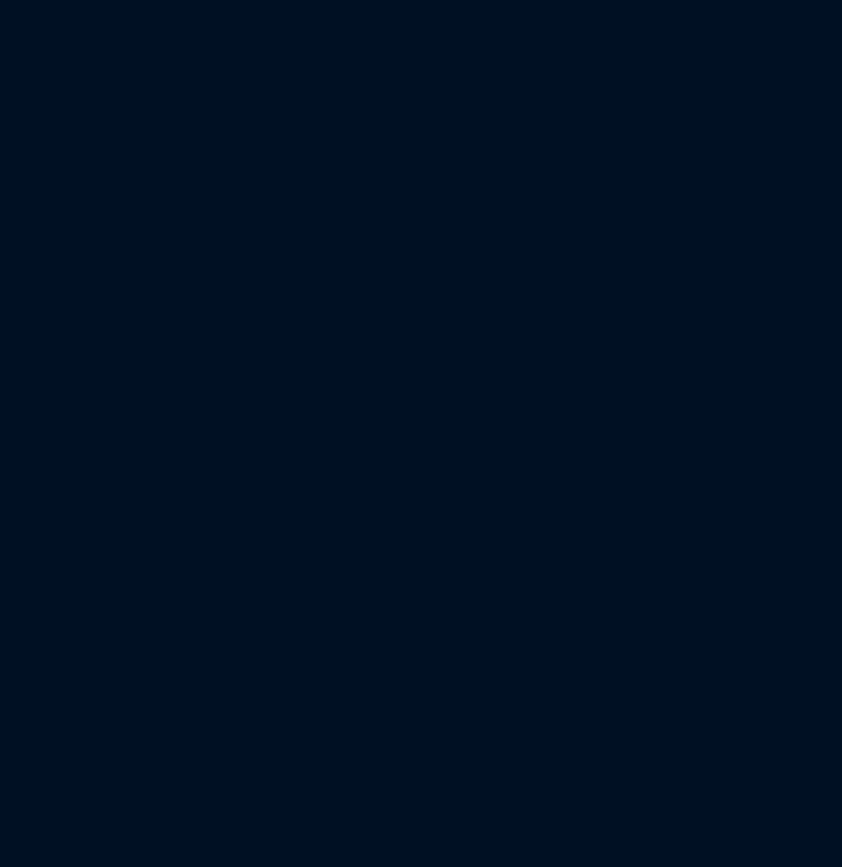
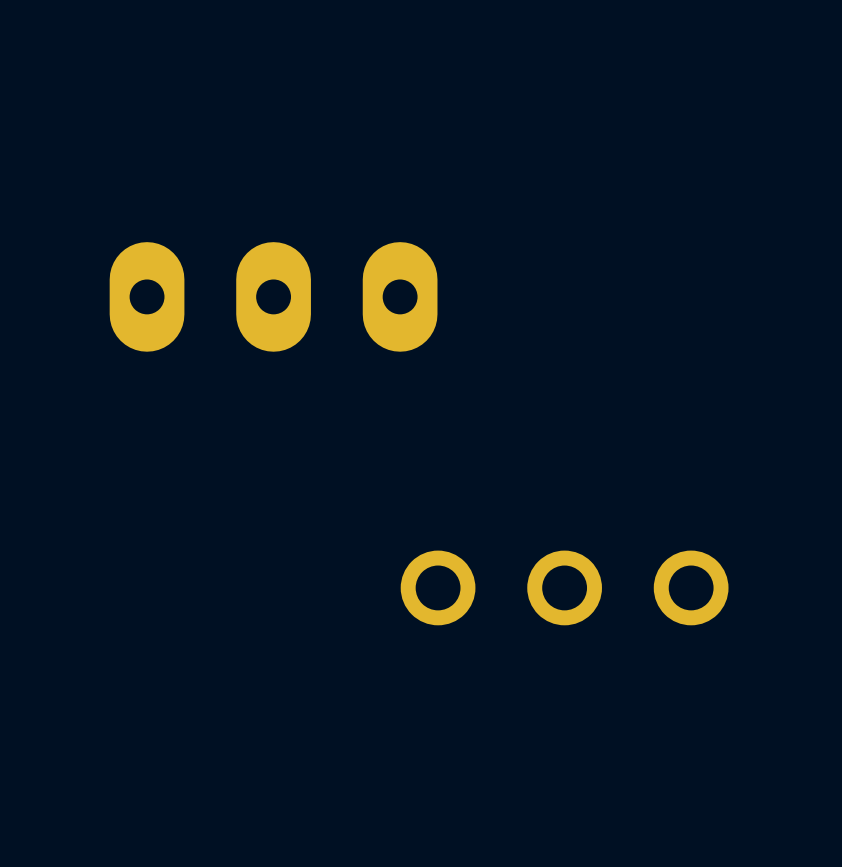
part: none -> (273, 296)
part: none -> (564, 587)

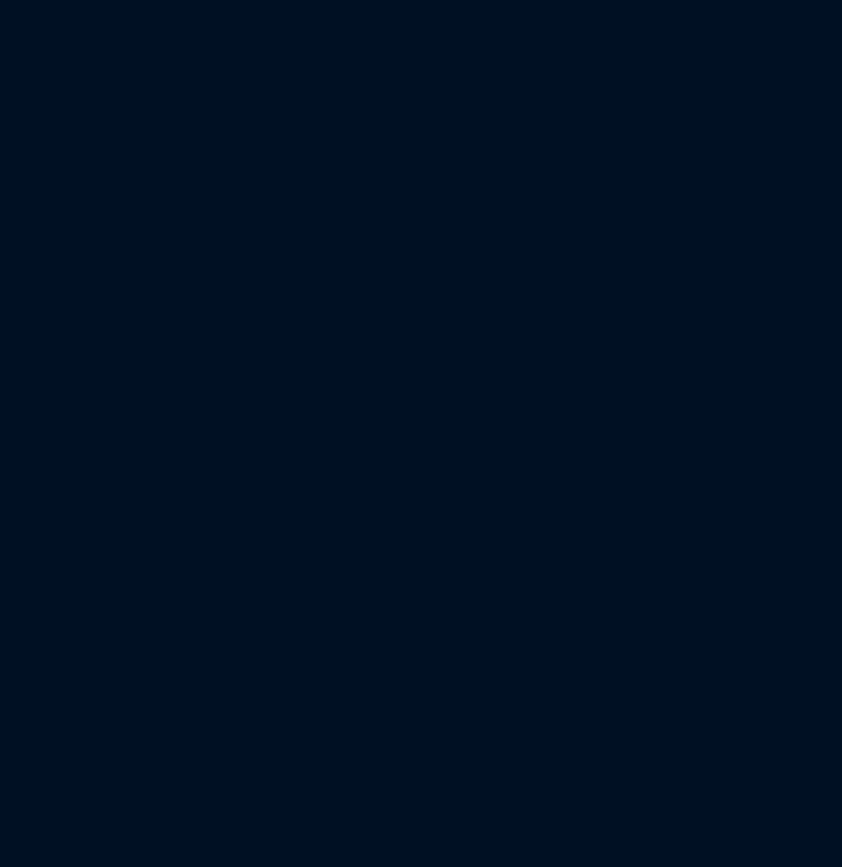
part: (273, 296) -> none
part: (564, 587) -> none

